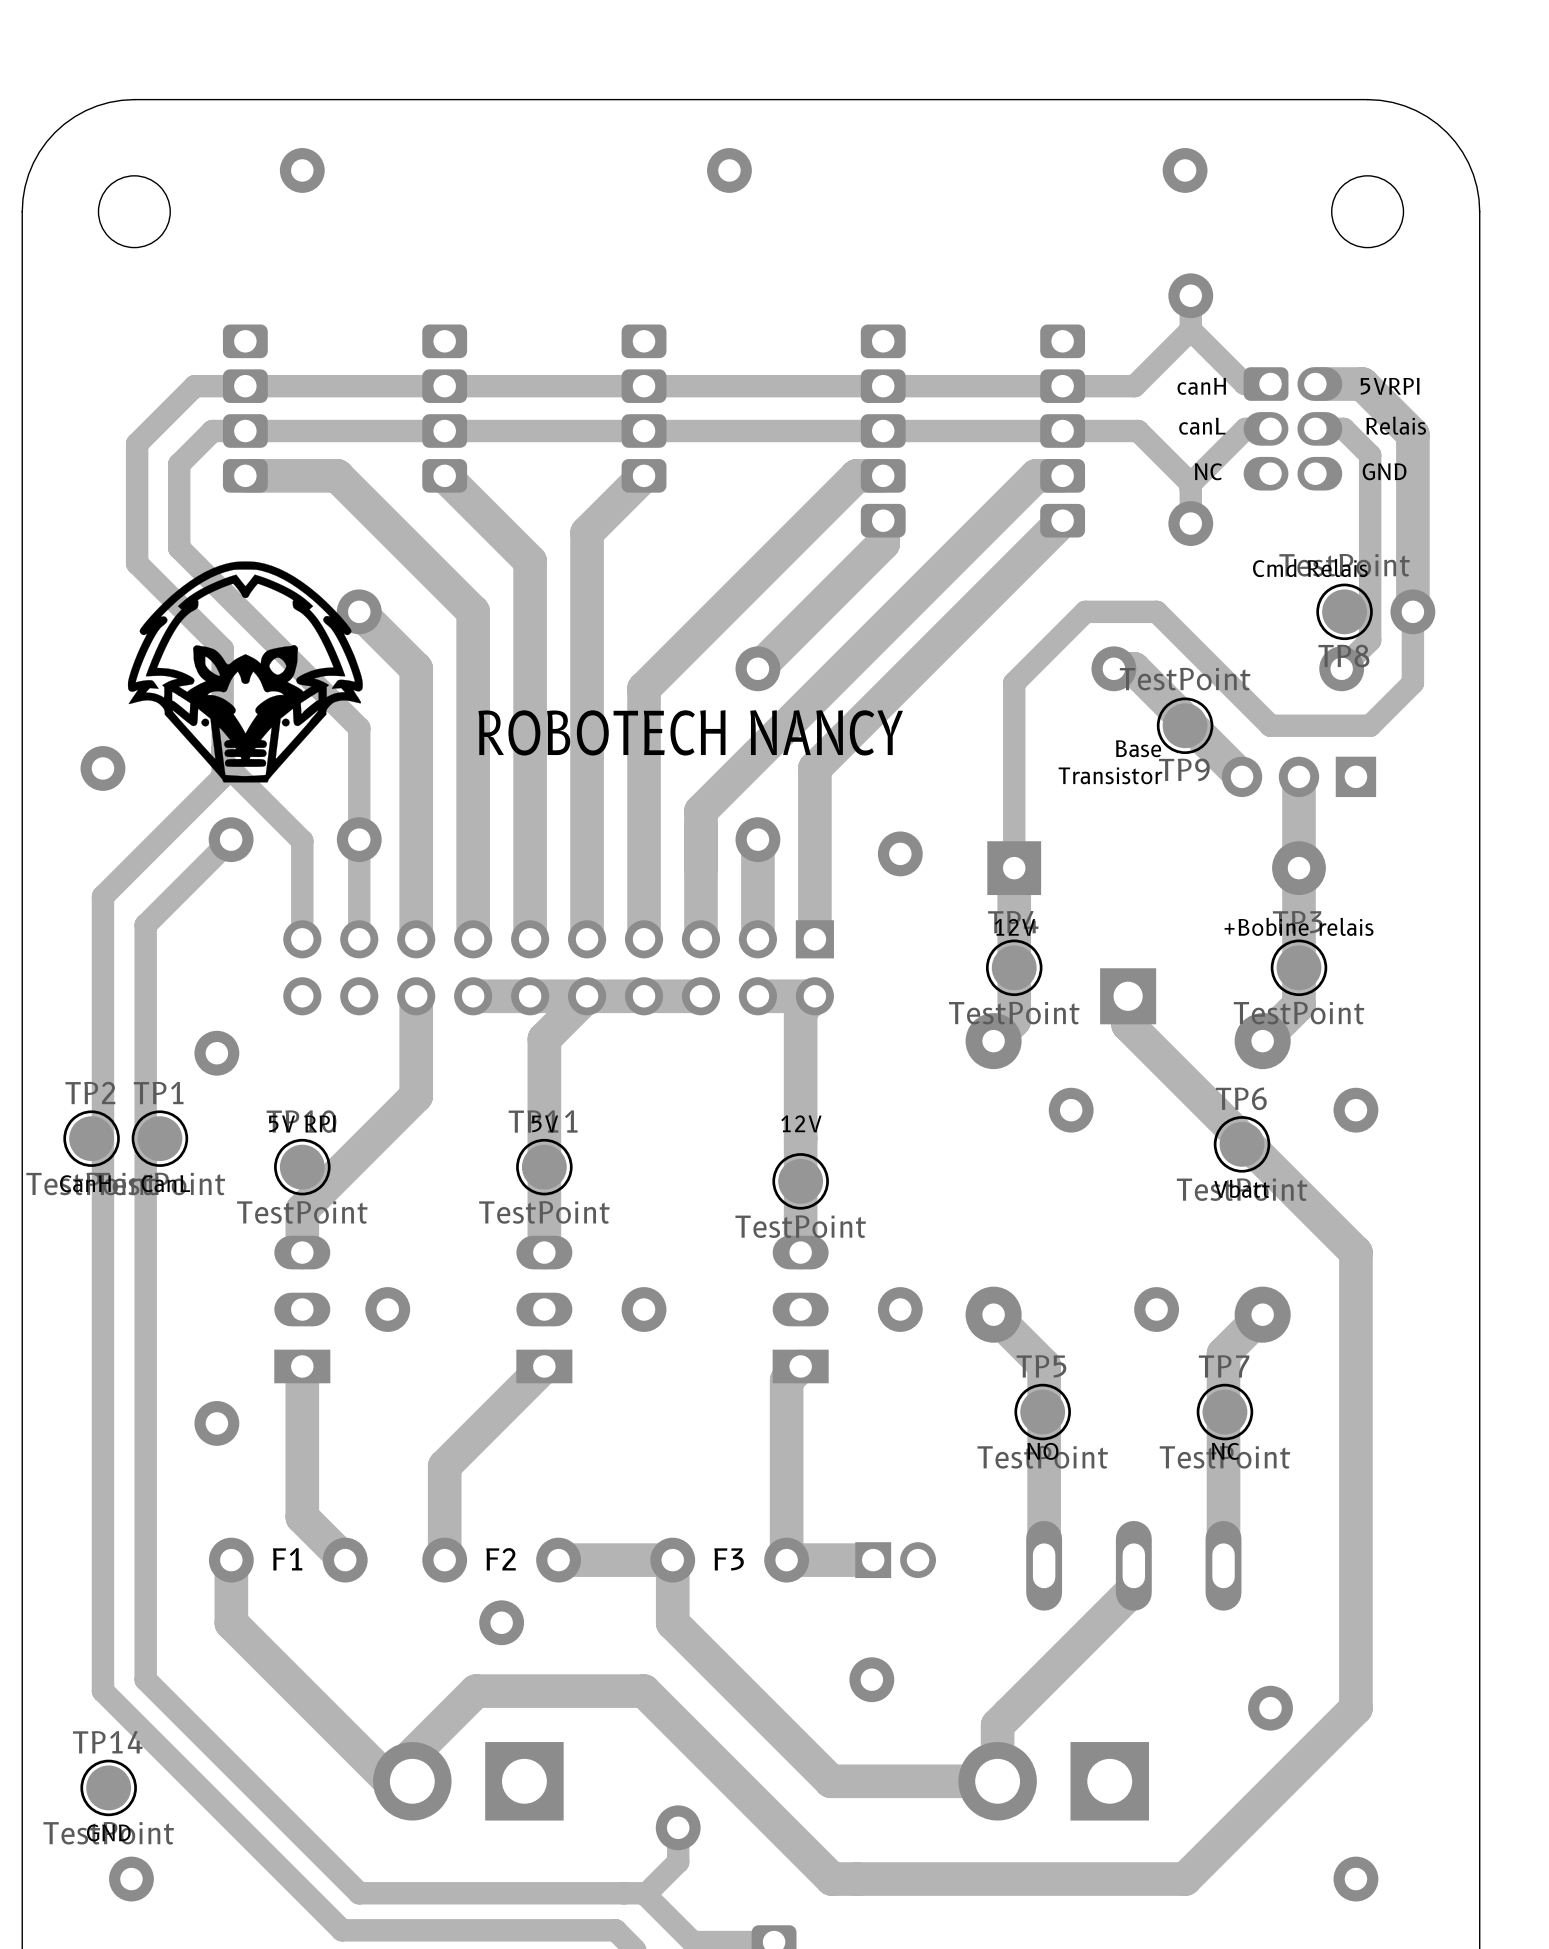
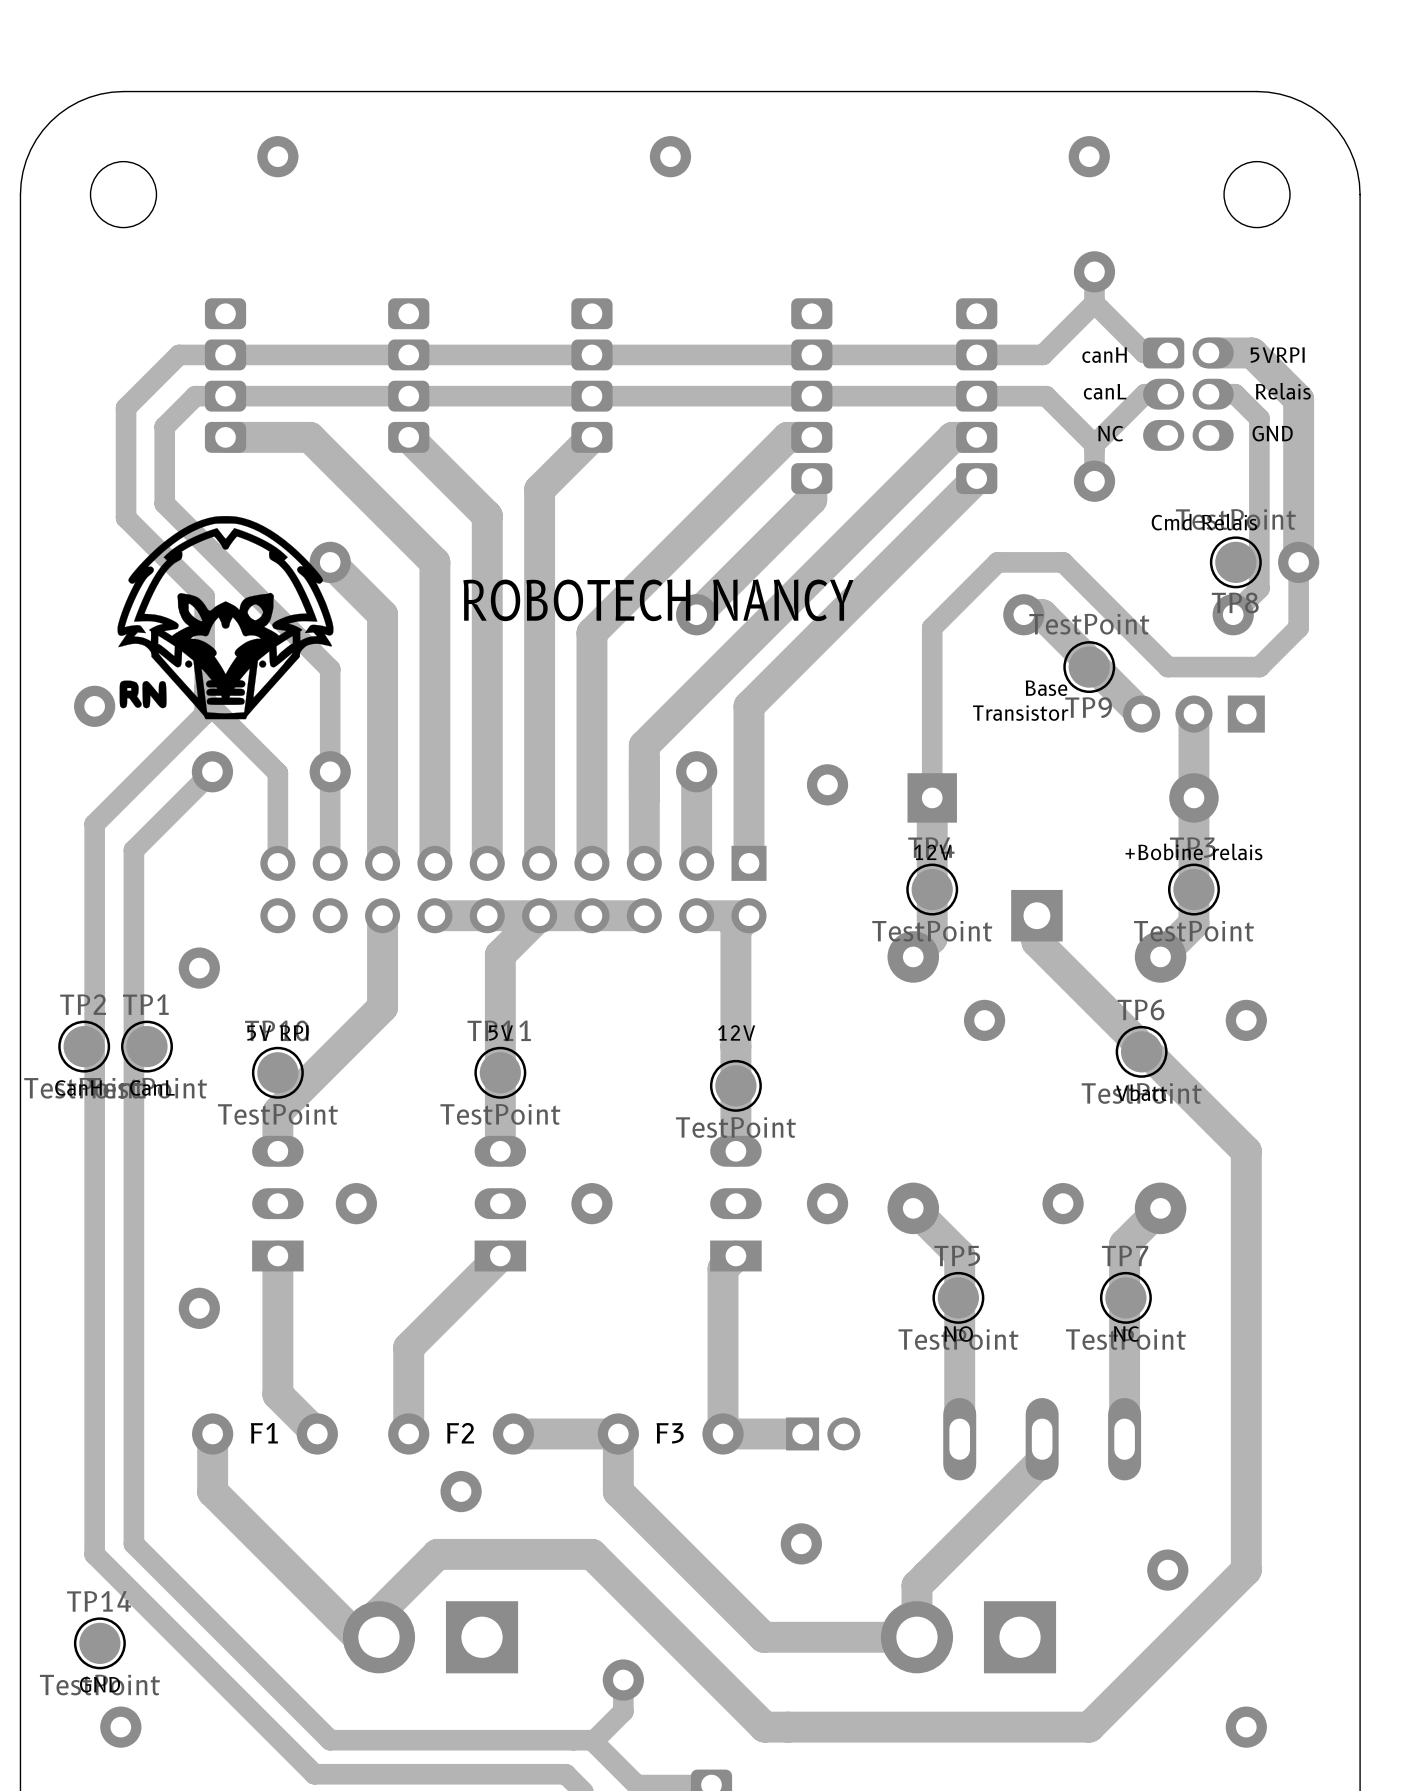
drawing shape: [127, 561, 363, 783] -> [117, 516, 334, 720]
text position: ROBOTECH NANCY (690, 732) -> ROBOTECH NANCY (658, 600)

